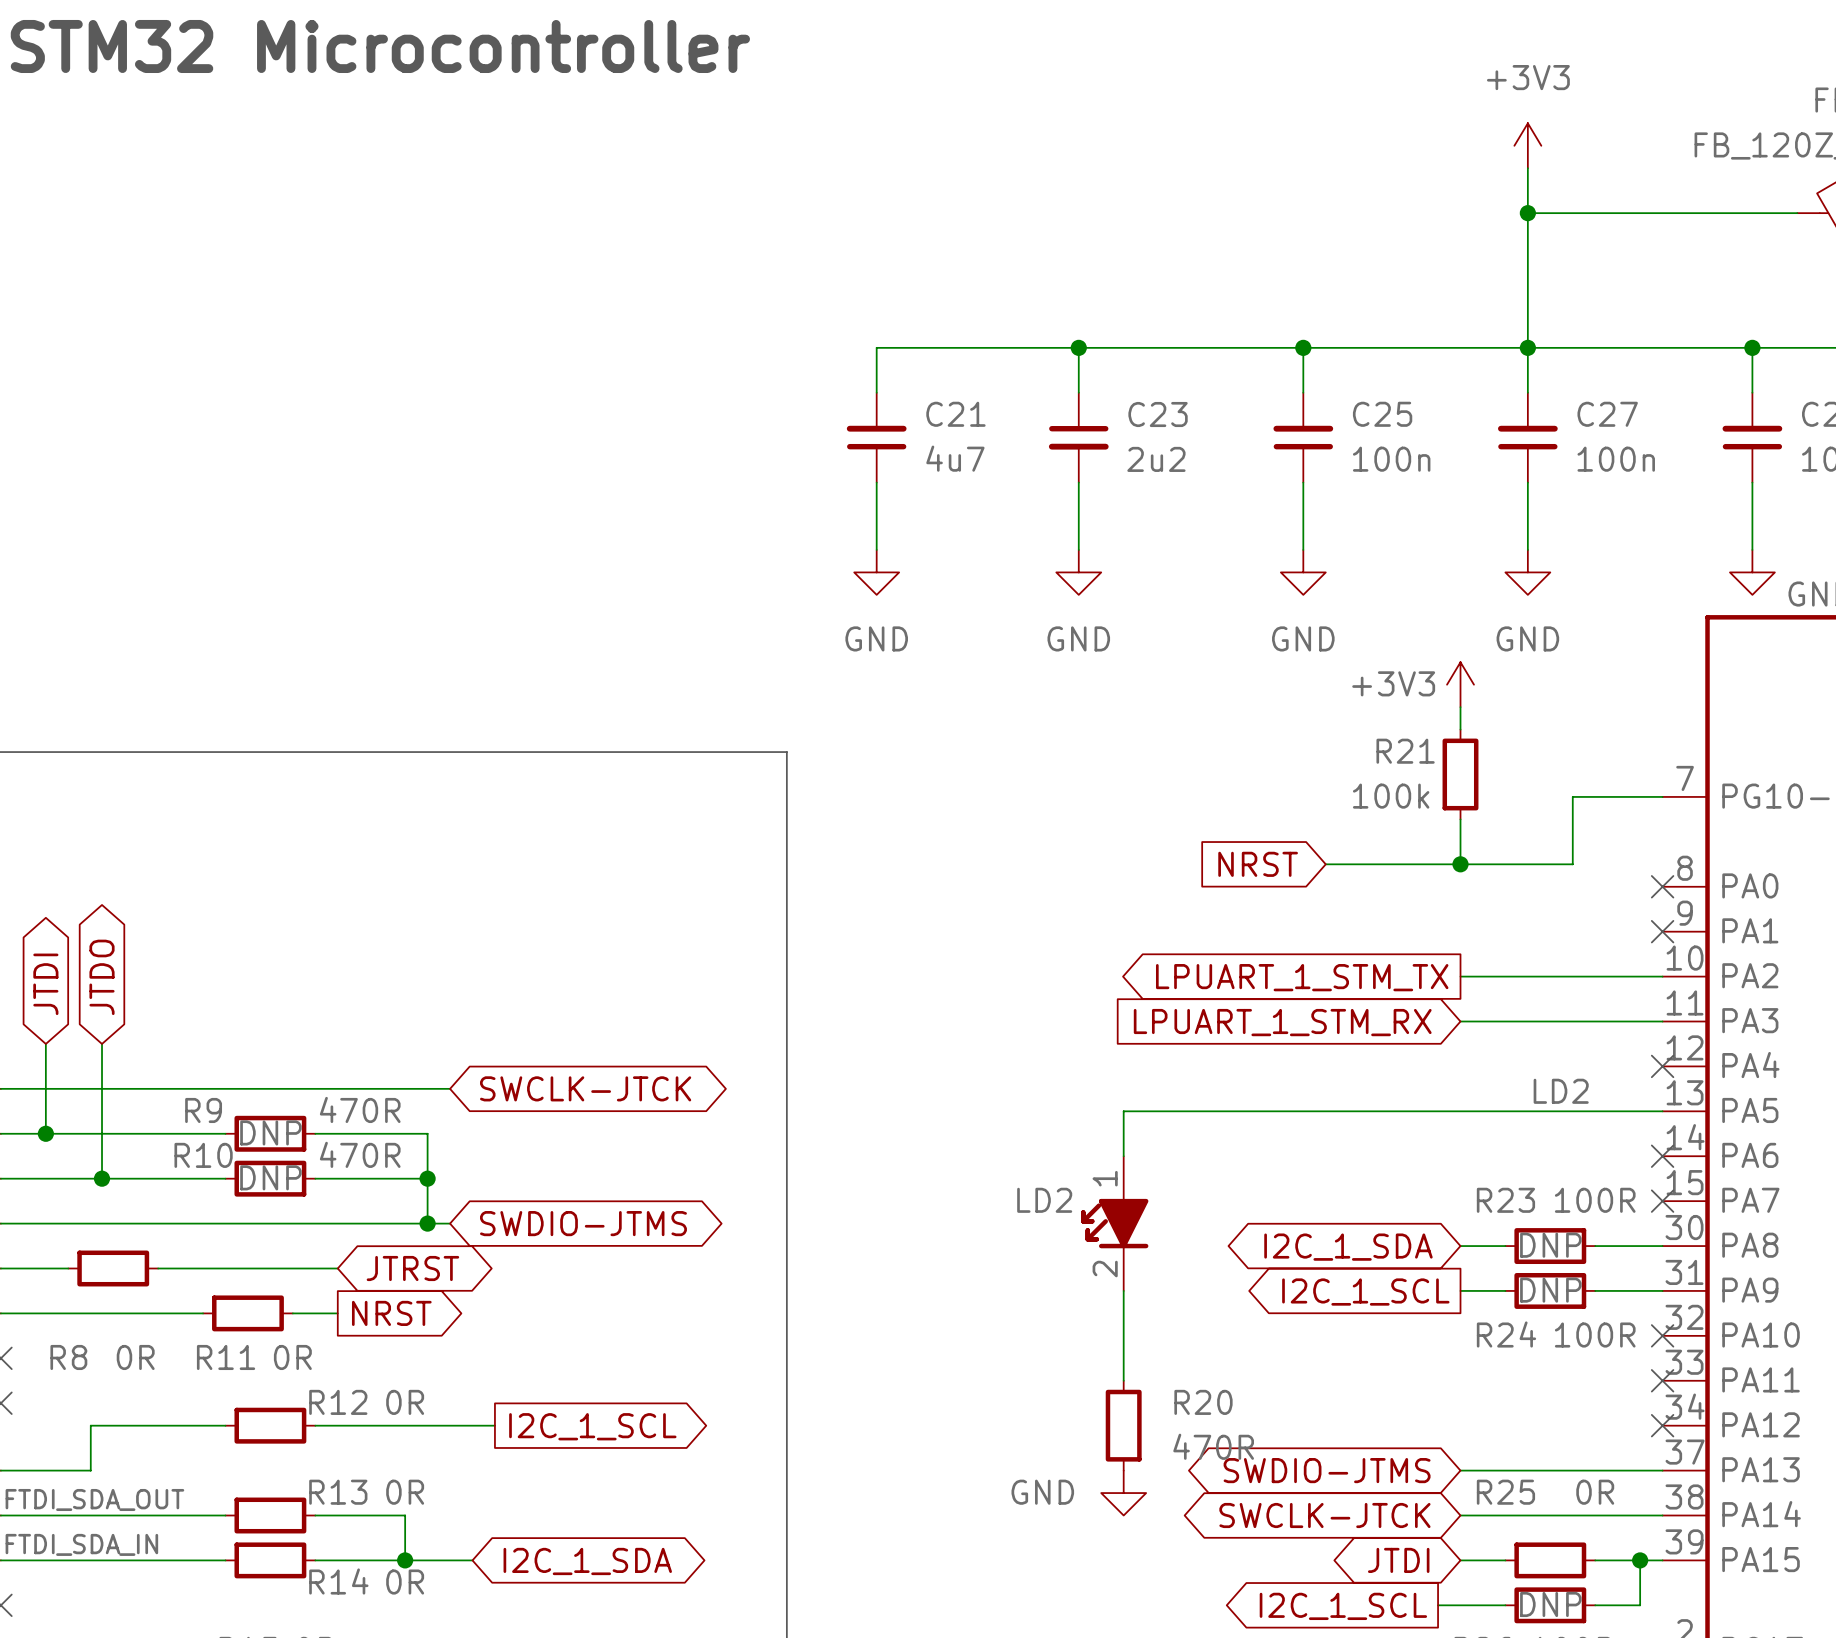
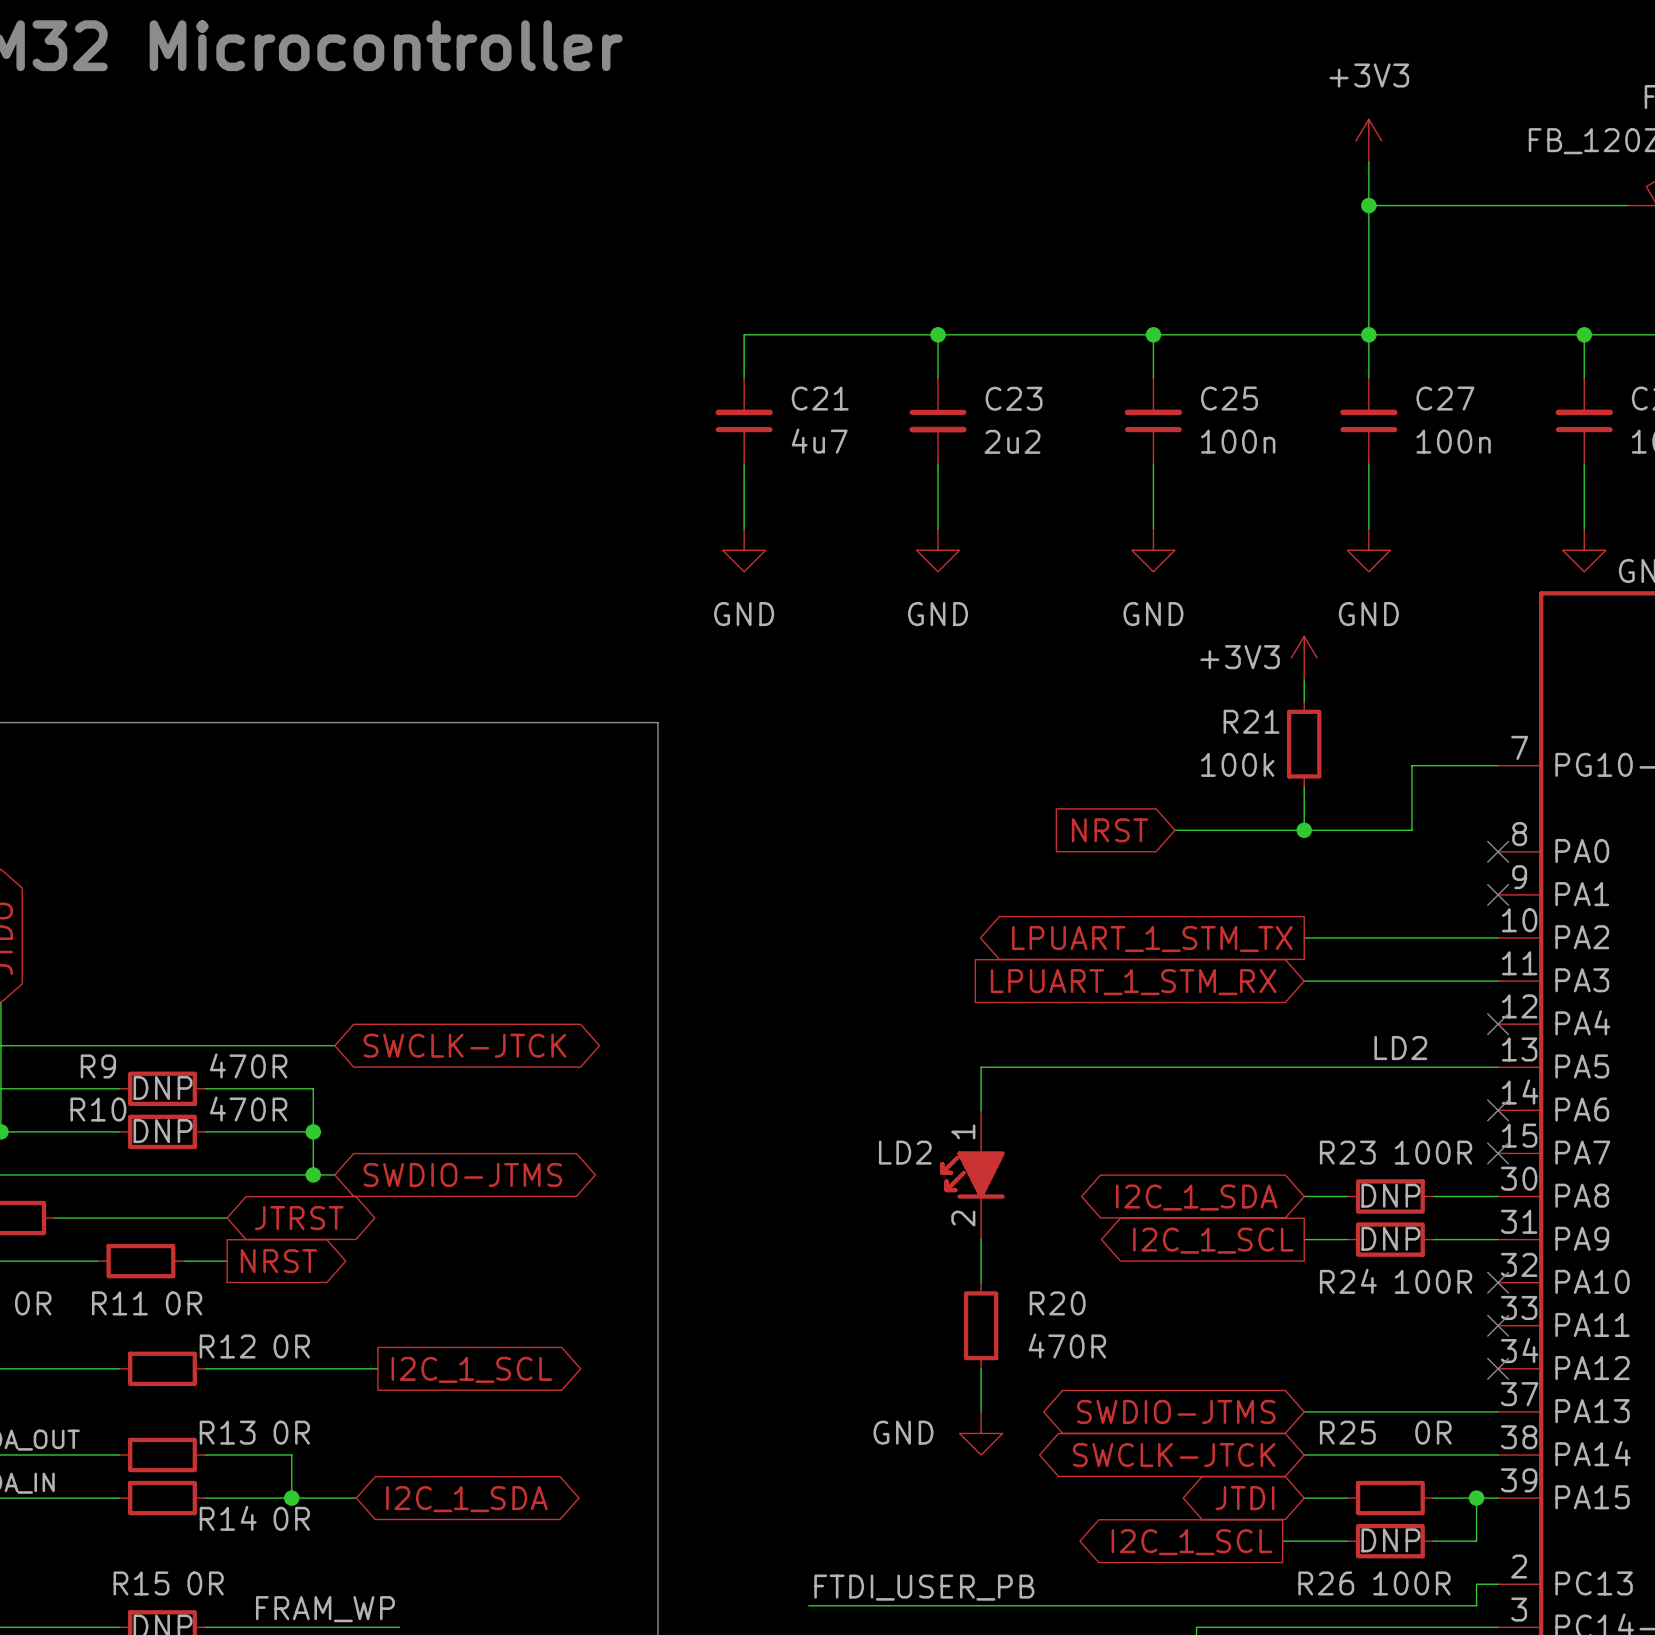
wire: (1123, 1335) (1123, 1380) -> (981, 1368) (981, 1411)
R20 position: (1123, 1425) -> (981, 1325)

